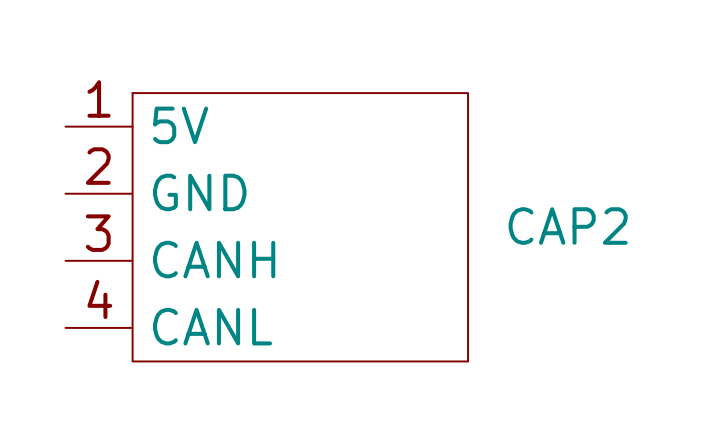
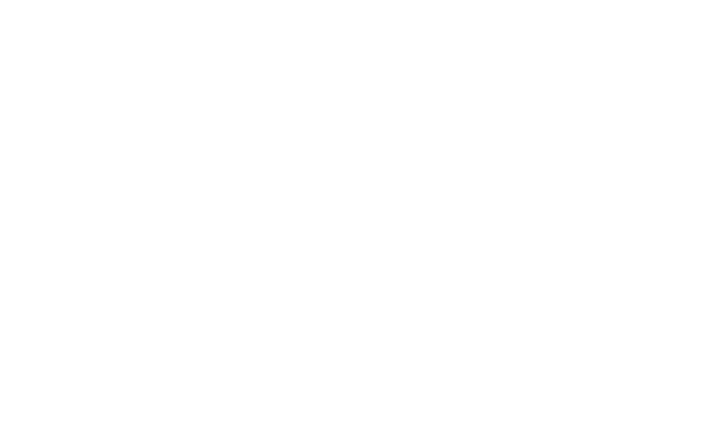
CAP2: (266, 227) -> none

